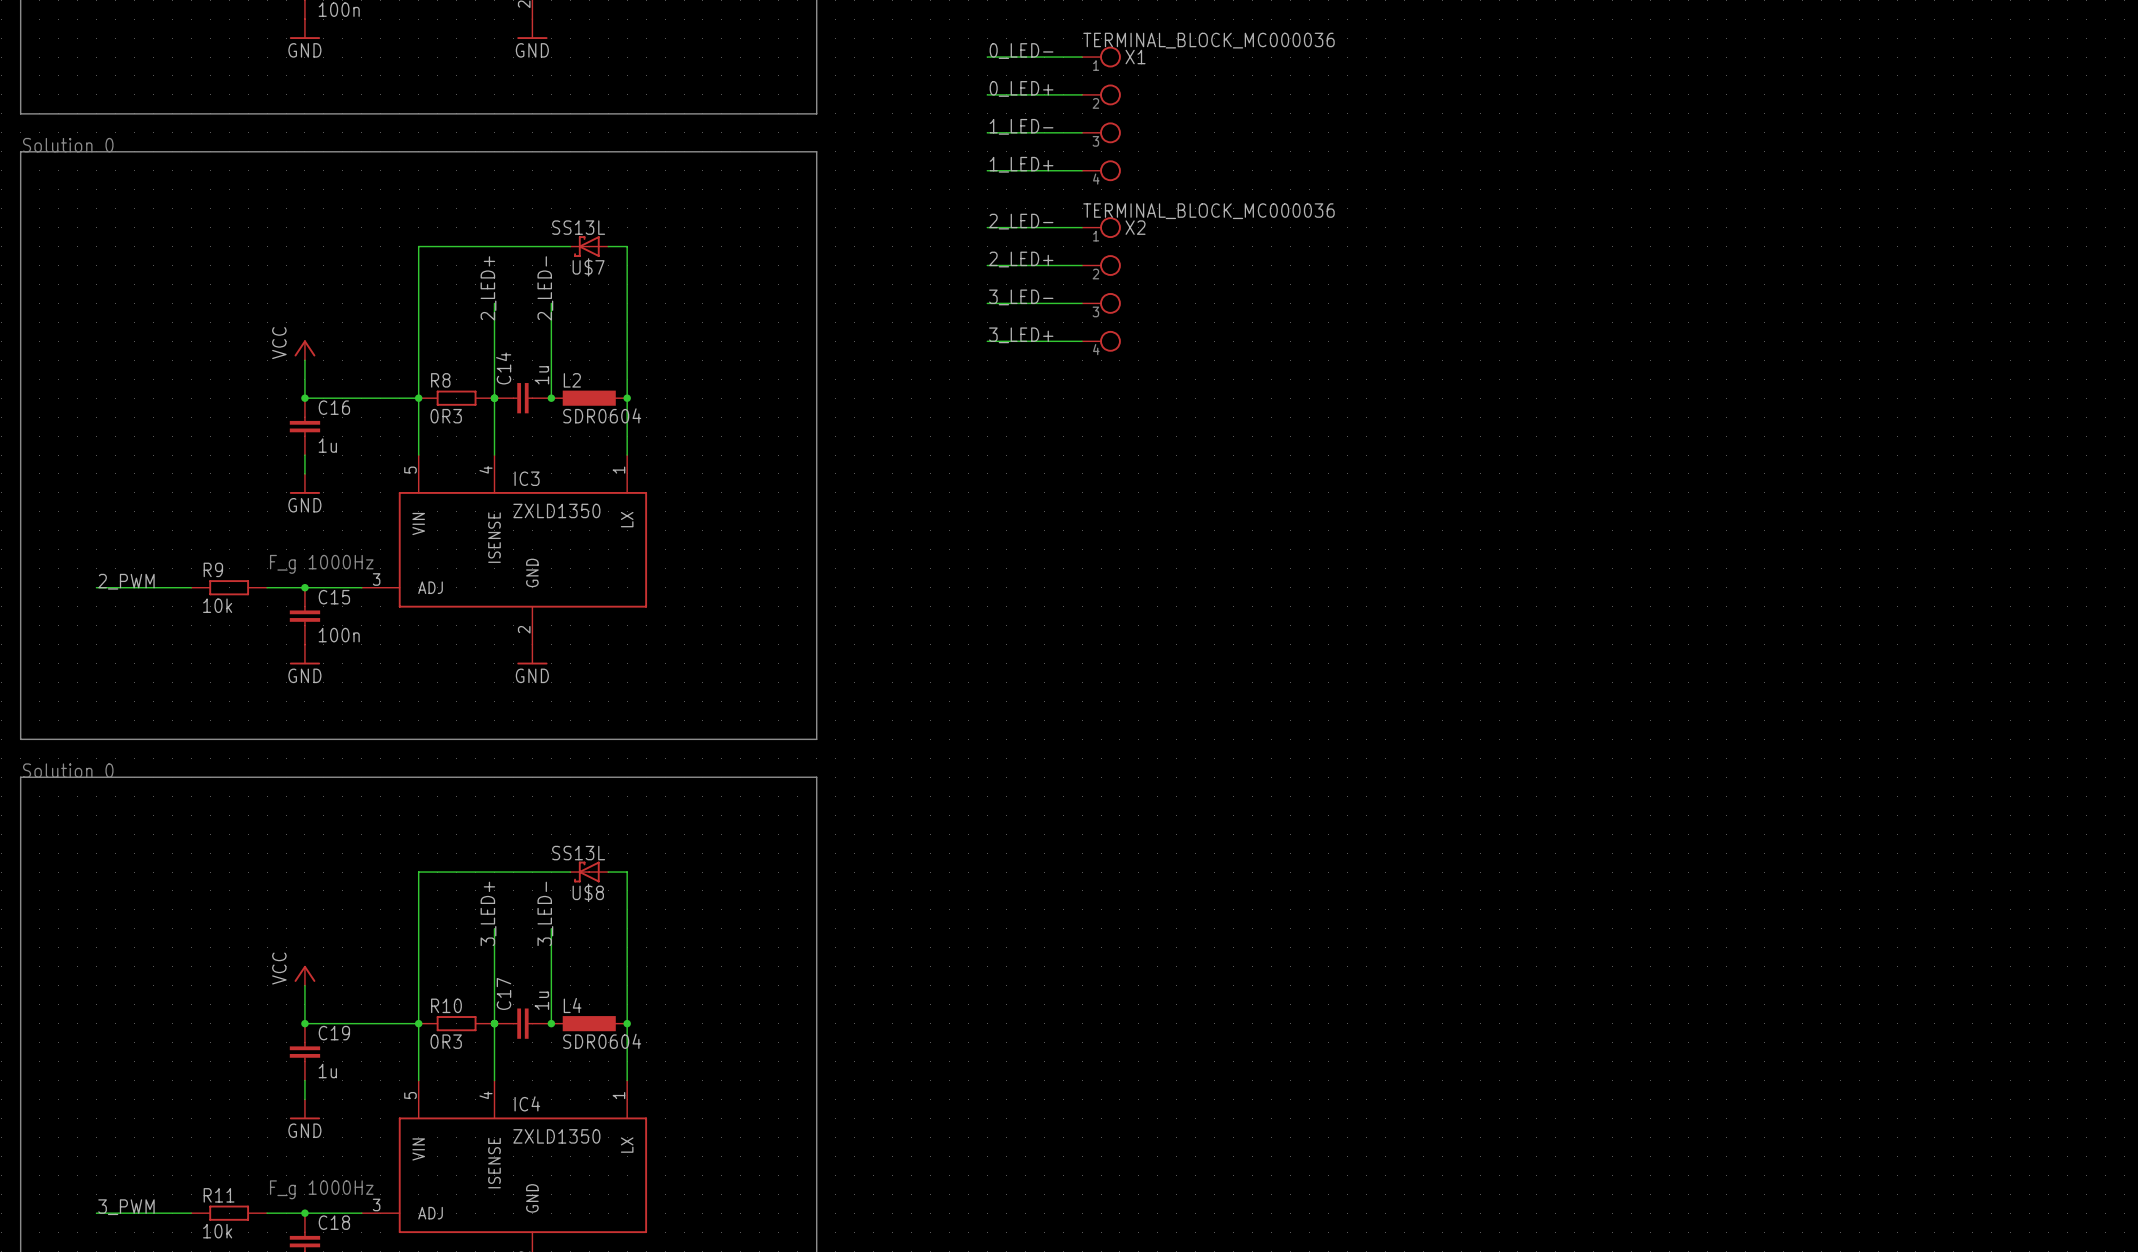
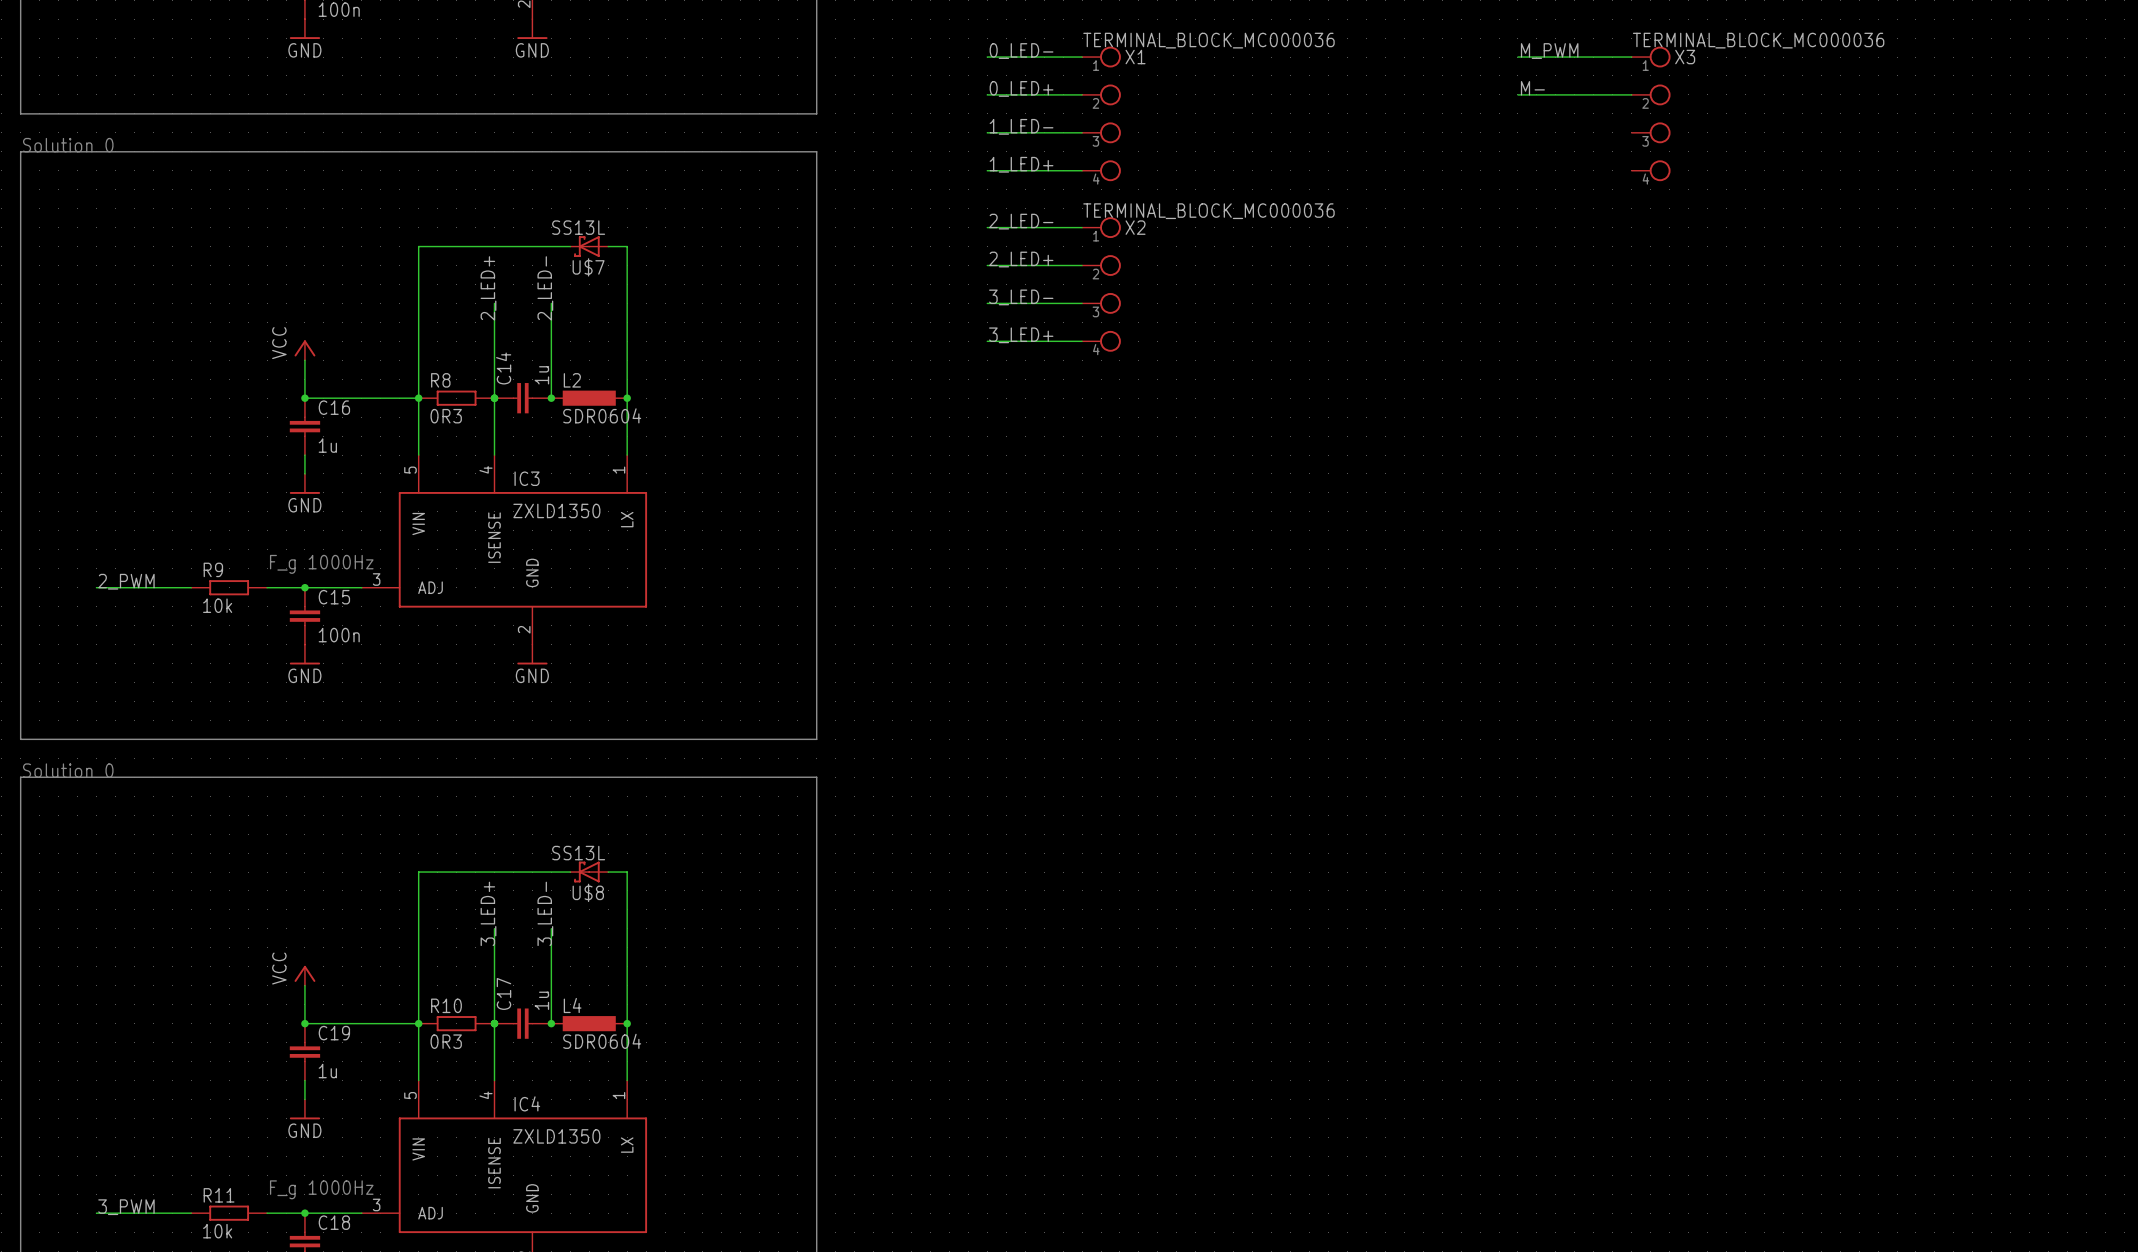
label: none -> M_PWM (1549, 51)
wire: none -> (1517, 57) (1631, 57)
label: none -> M- (1532, 88)
wire: none -> (1517, 94) (1631, 94)
X3: none -> TERMINAL_BLOCK_MC000036 (1651, 113)

